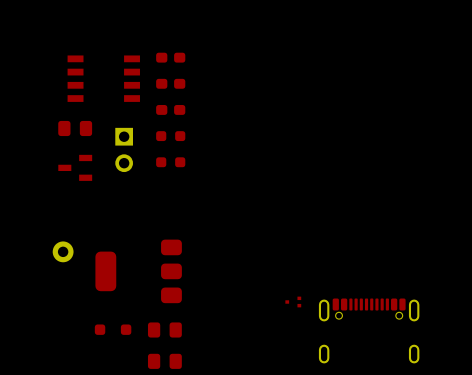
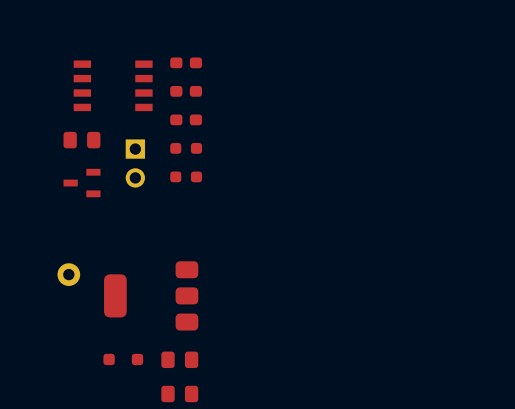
part: (293, 302) -> none
part: (369, 330) -> none

